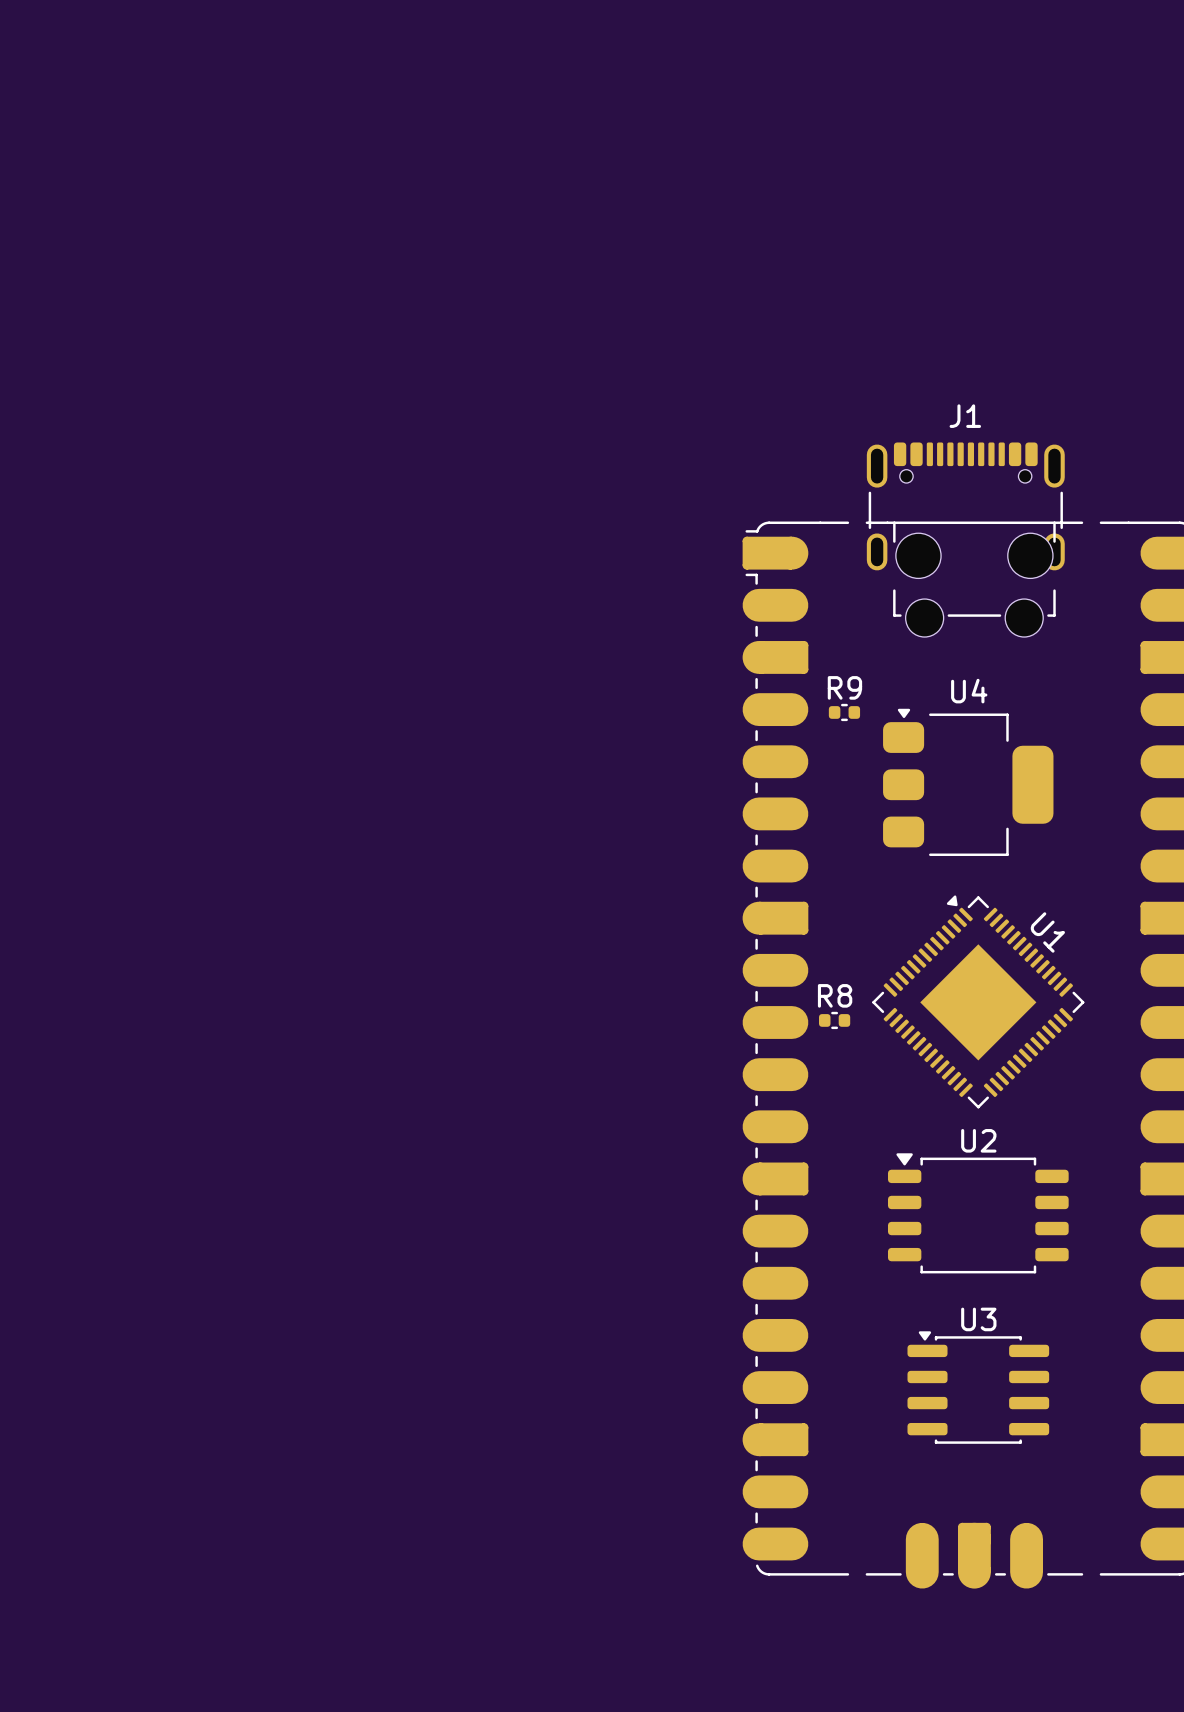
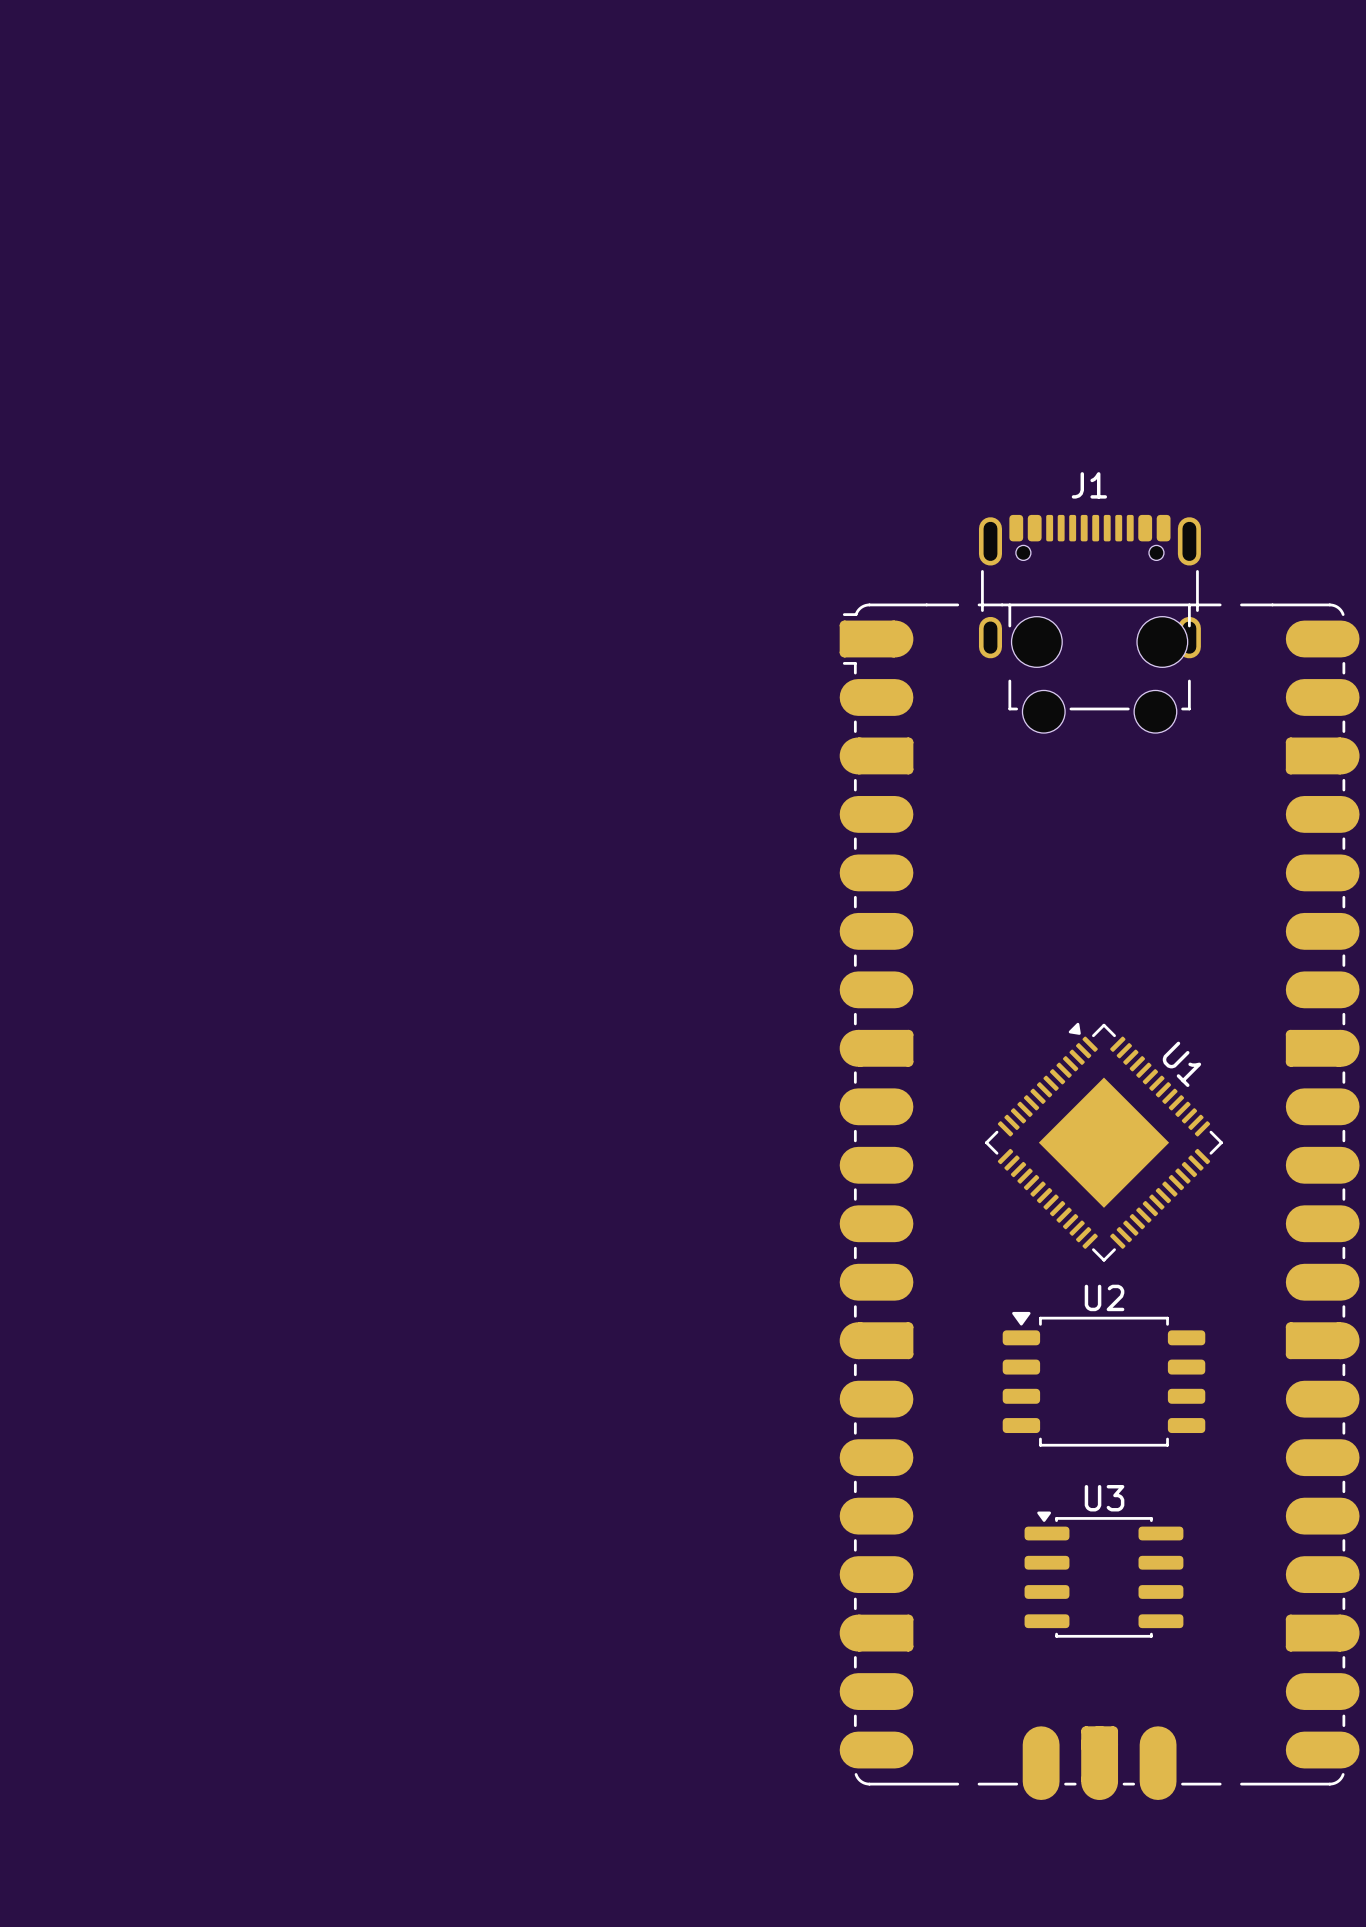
R9: (844, 712) -> none
U4: (968, 782) -> none
R8: (834, 1020) -> none

